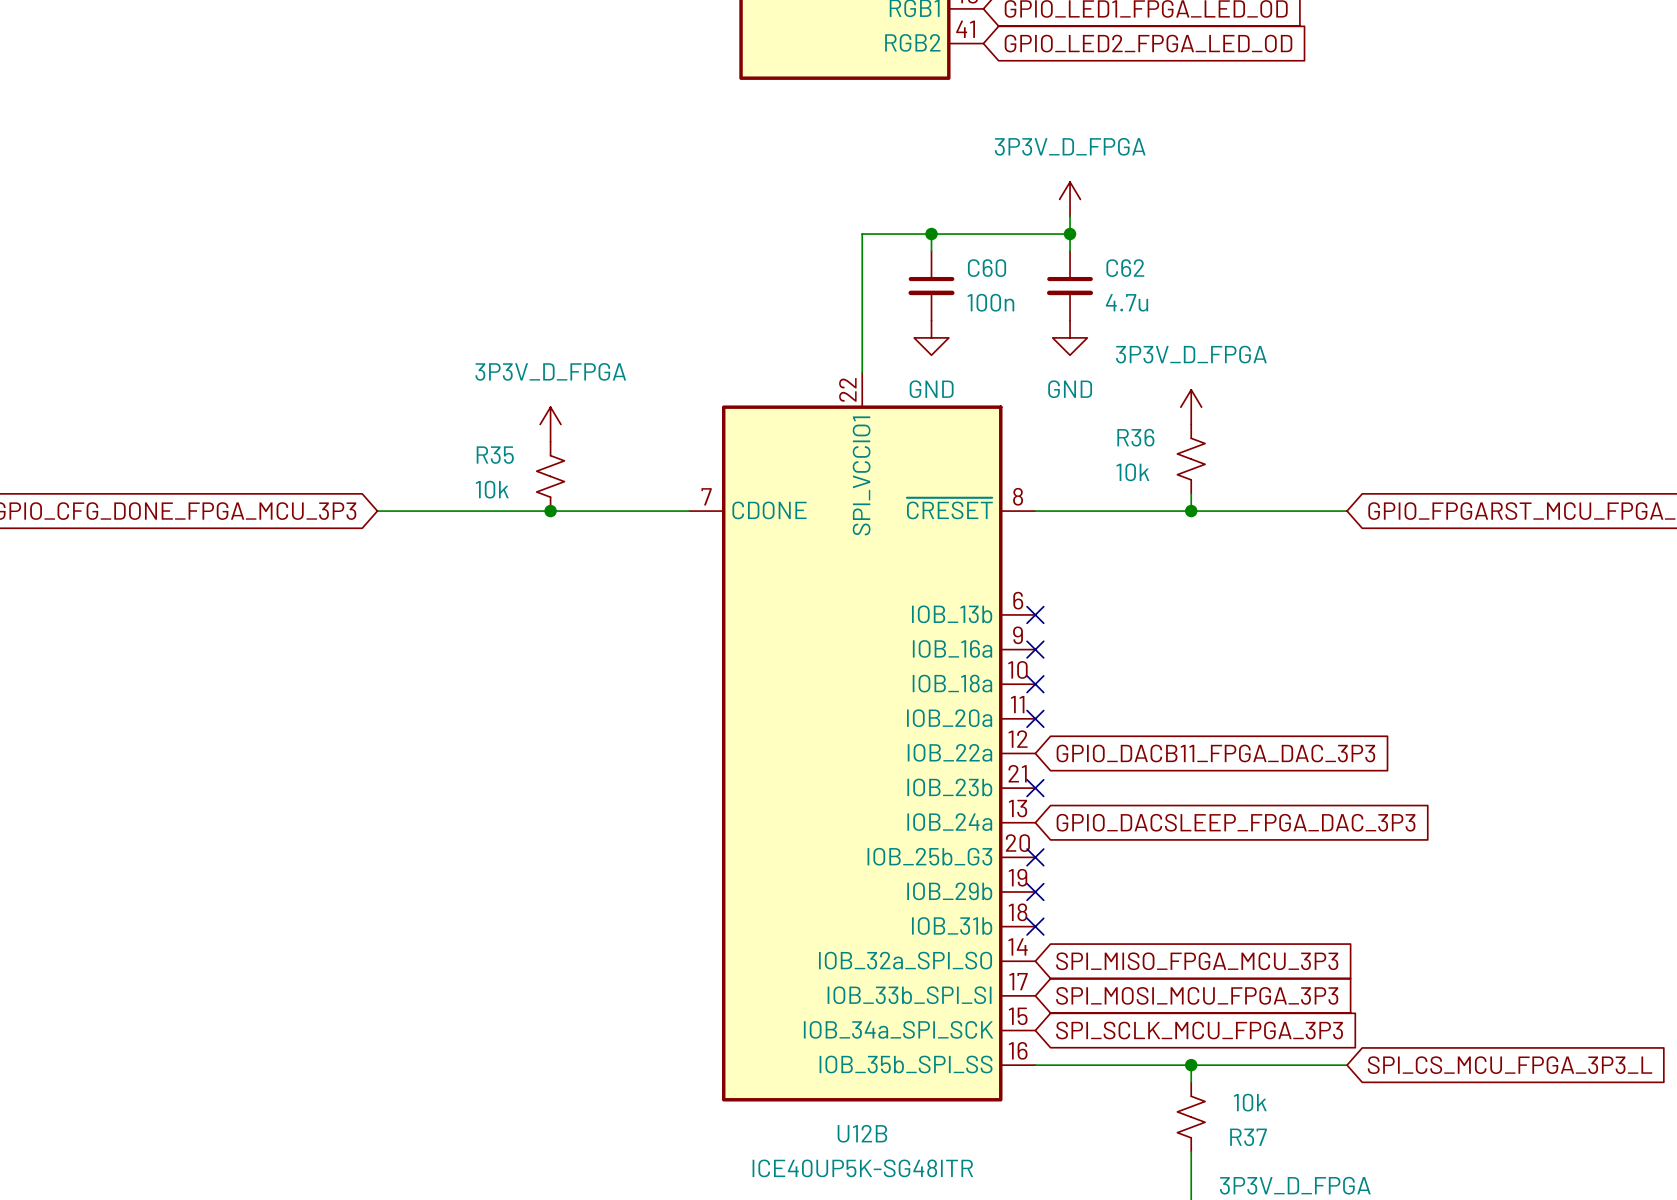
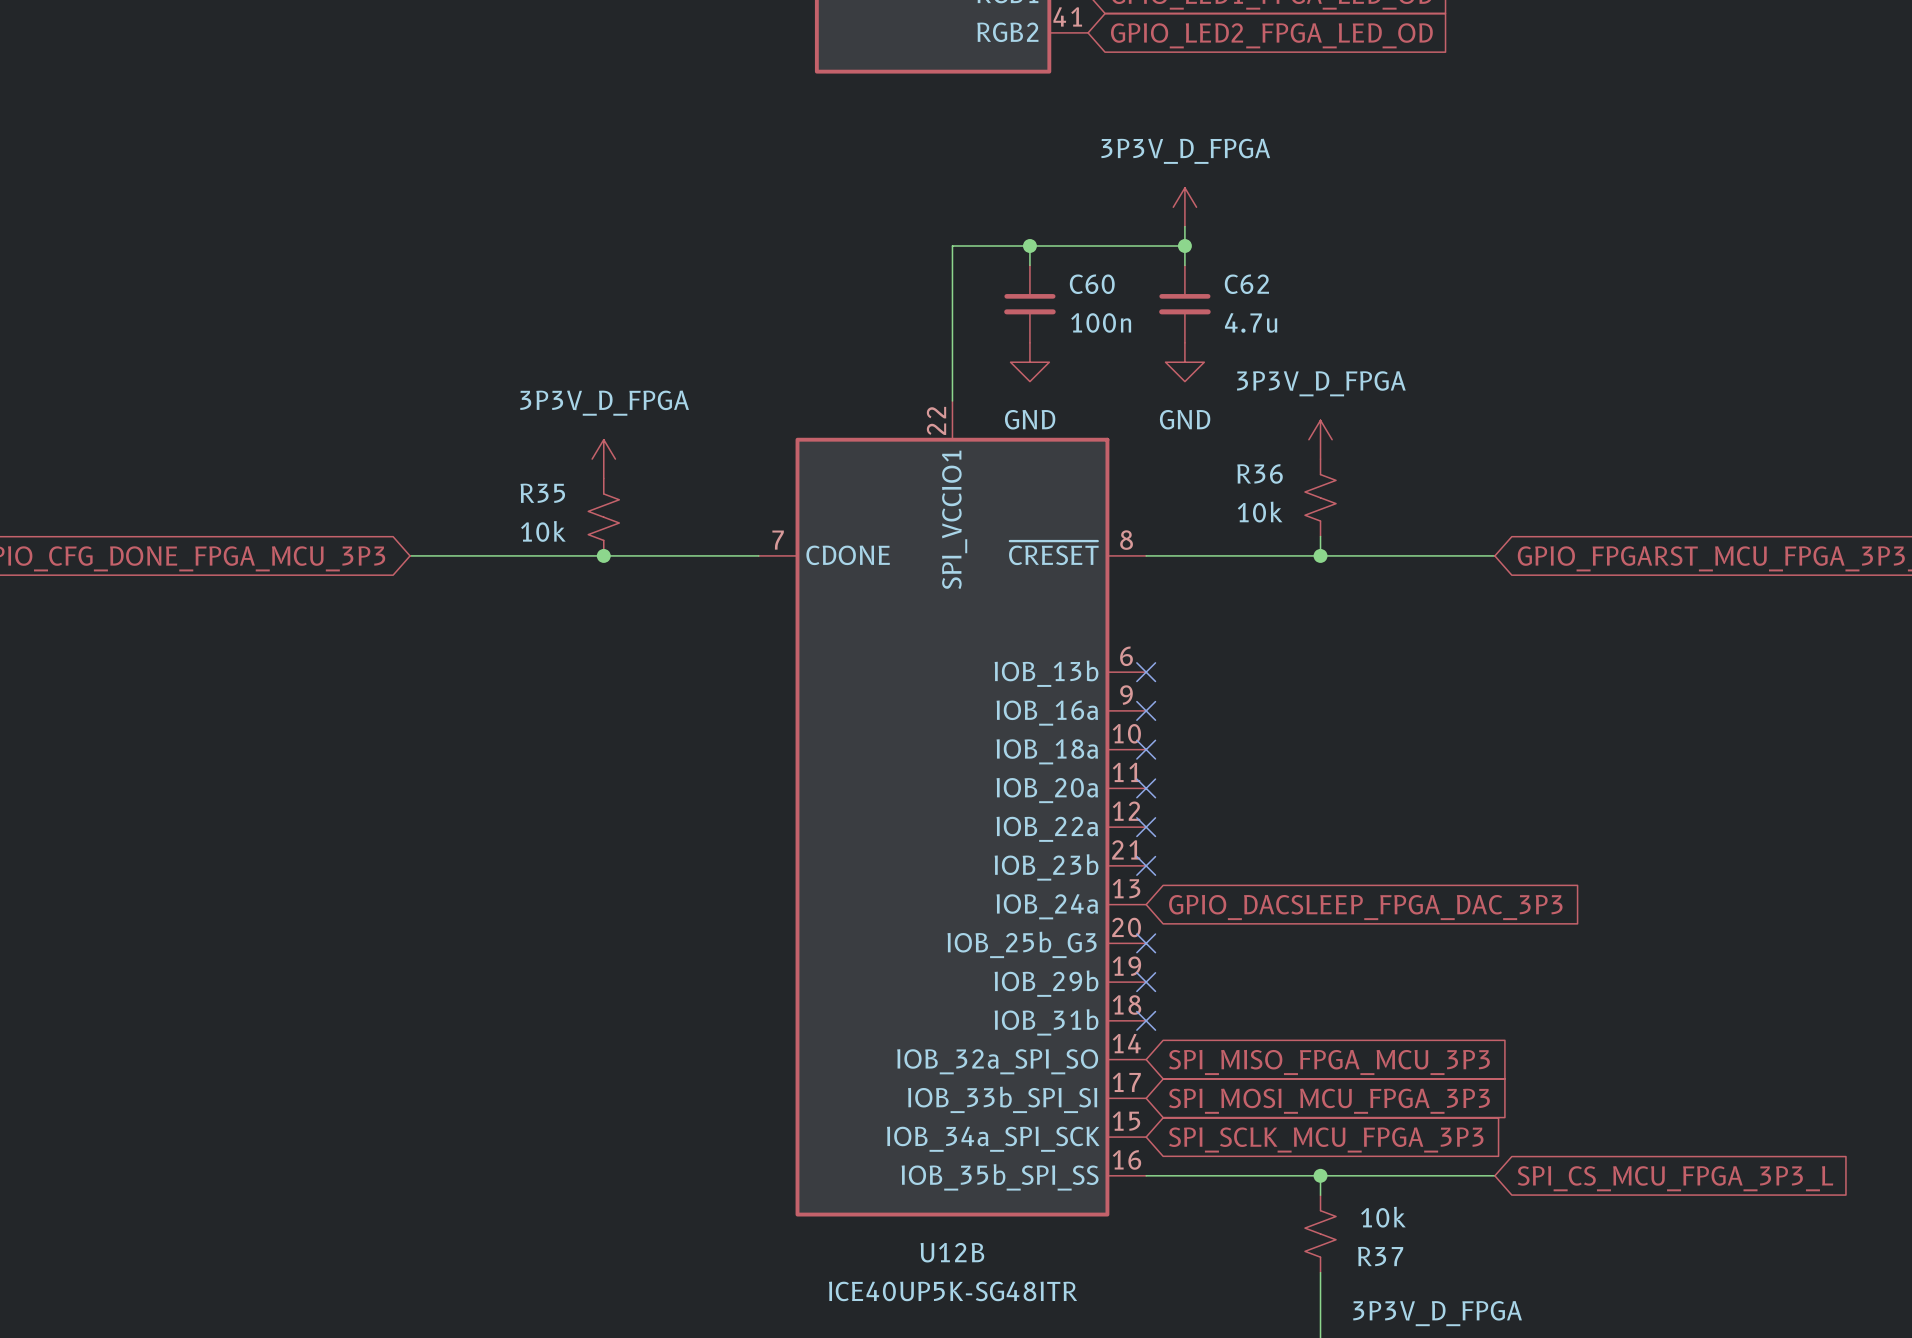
no-connect mark: none -> (1146, 827)
global label: GPIO_DACB11_FPGA_DAC_3P3 (1215, 753) -> none

